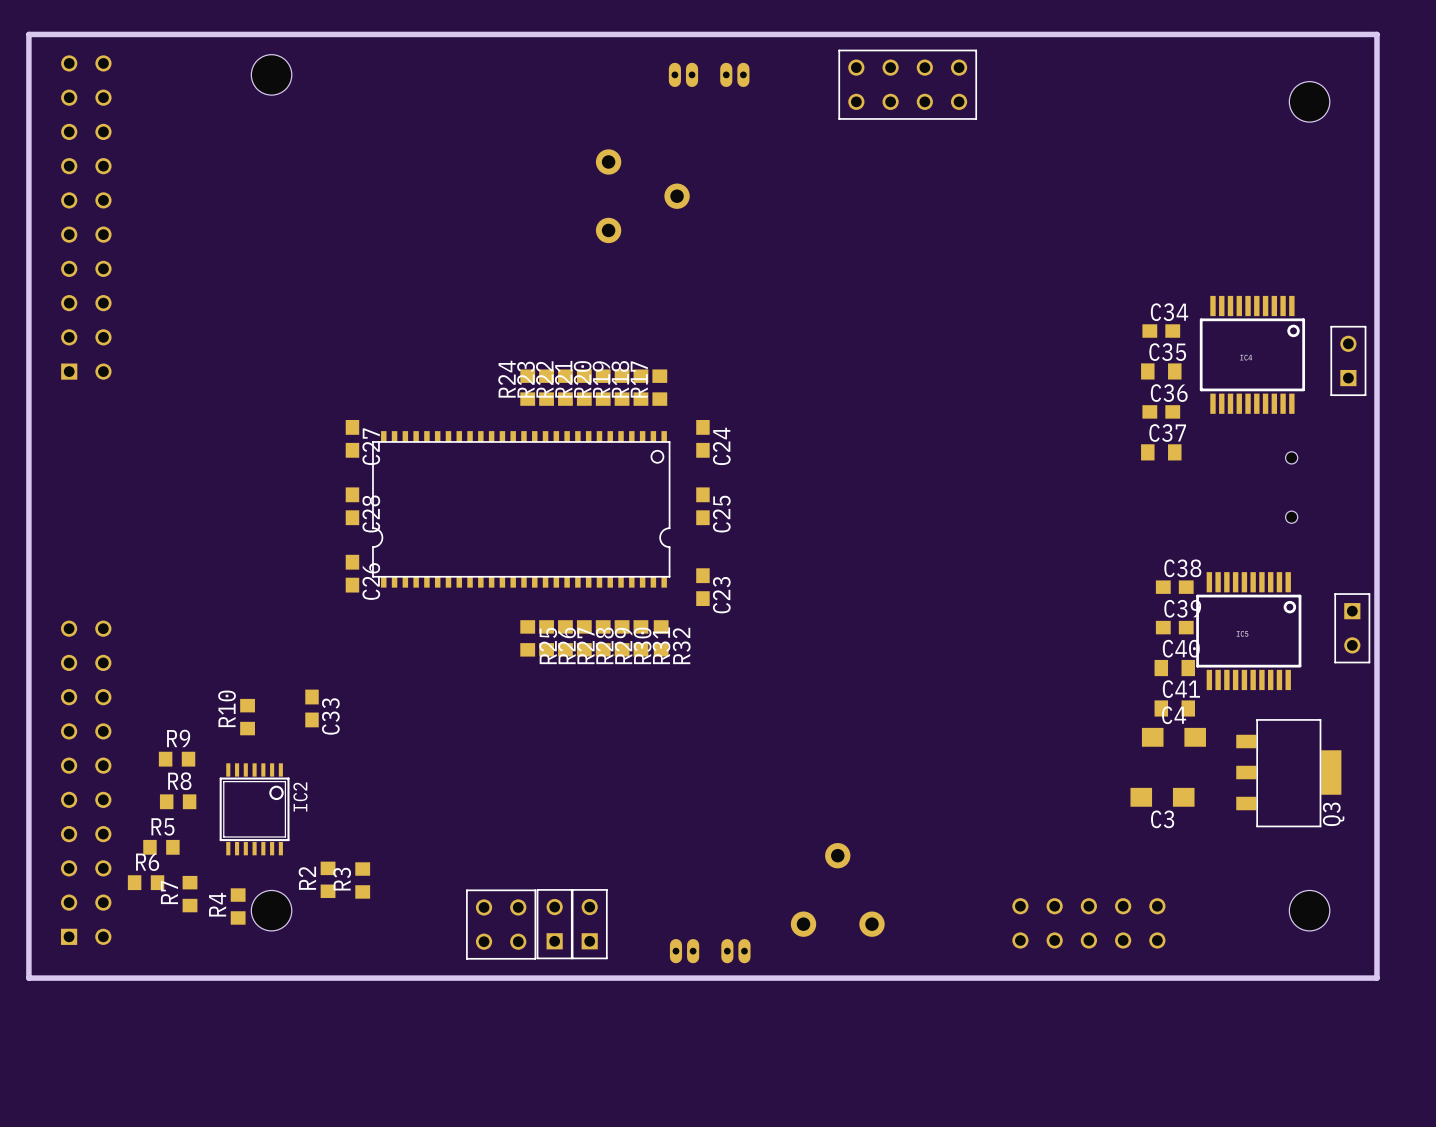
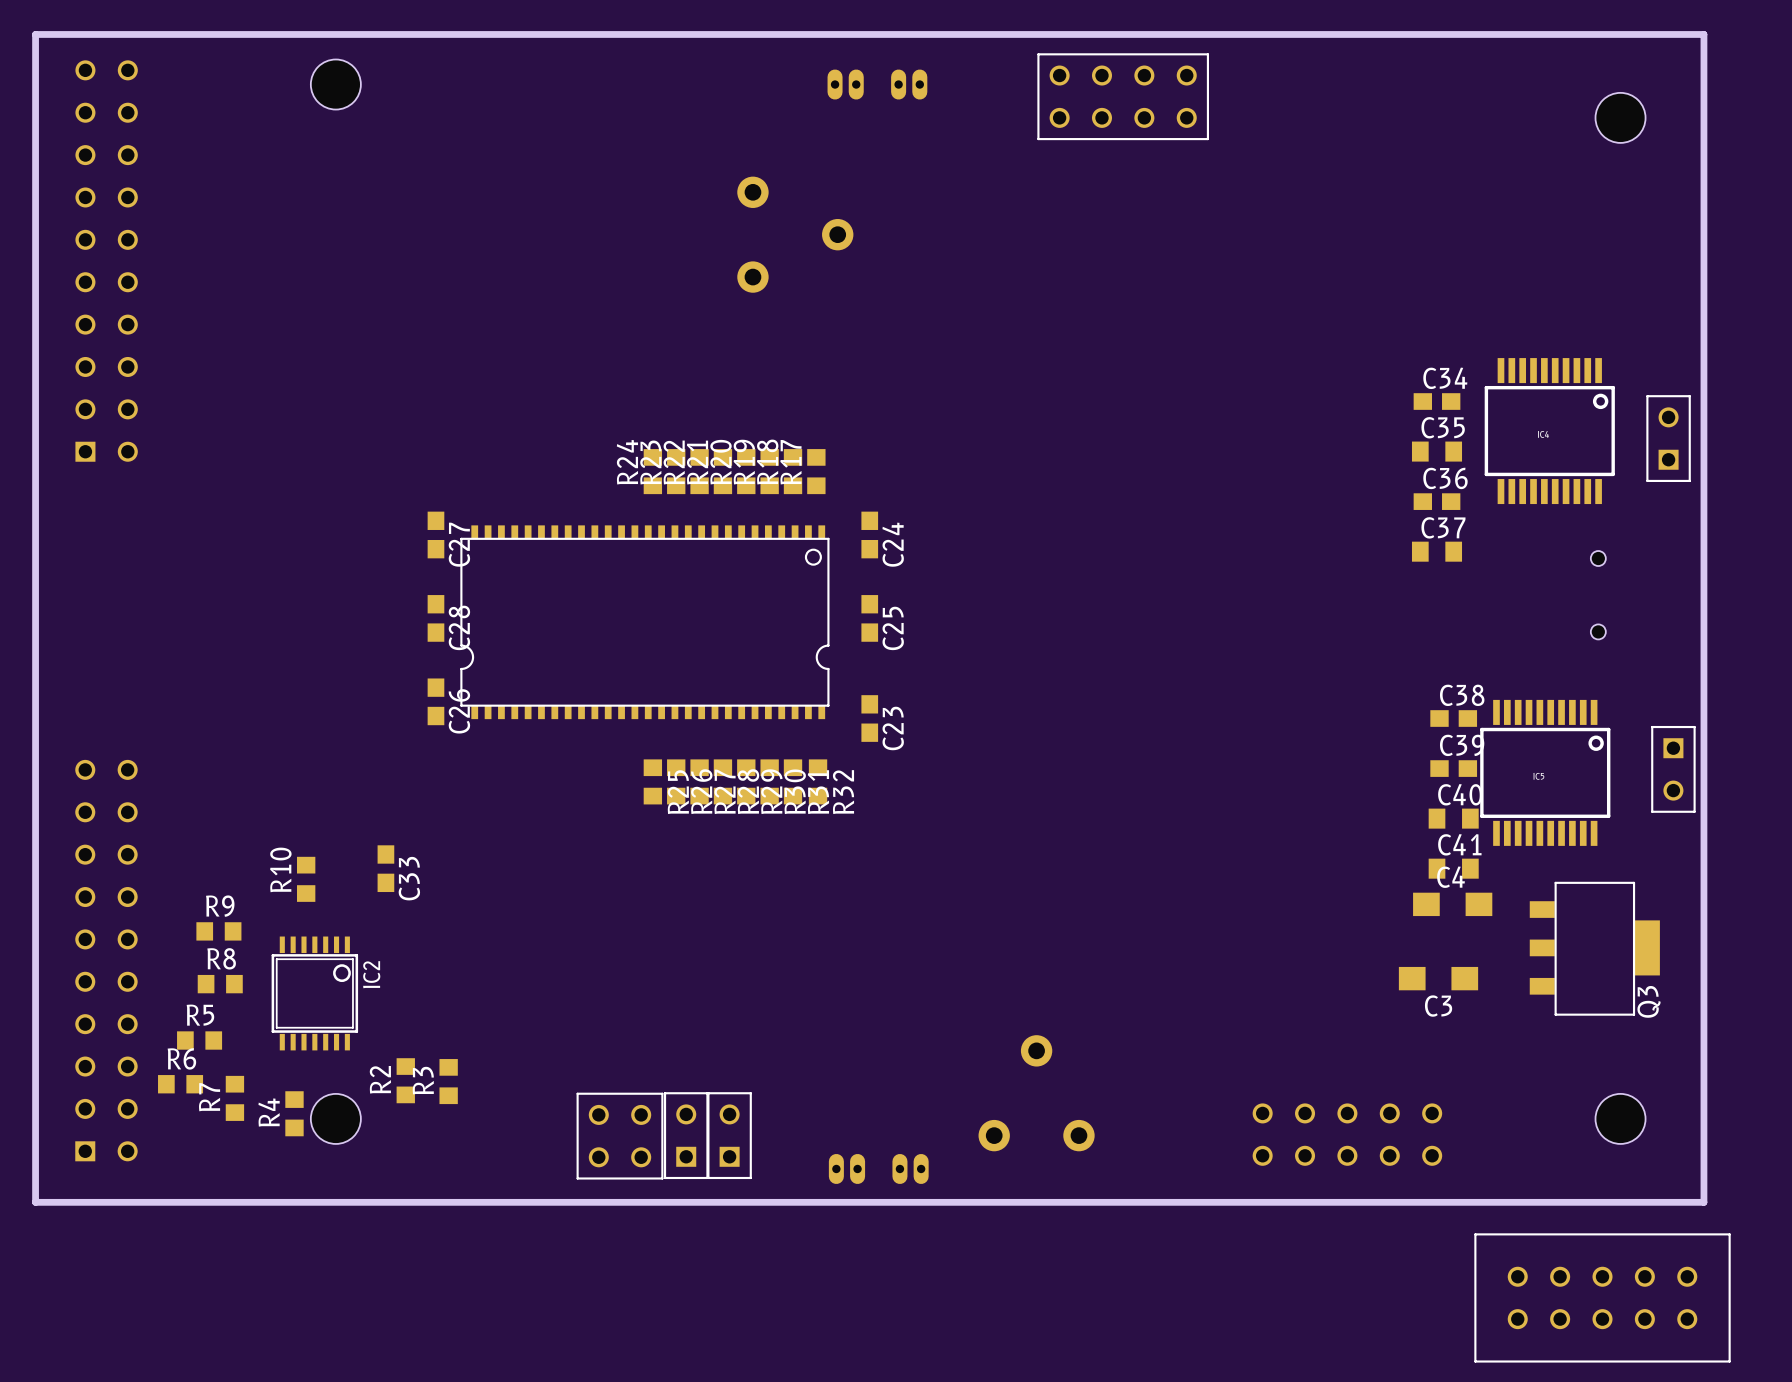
part: none -> (1602, 1297)

